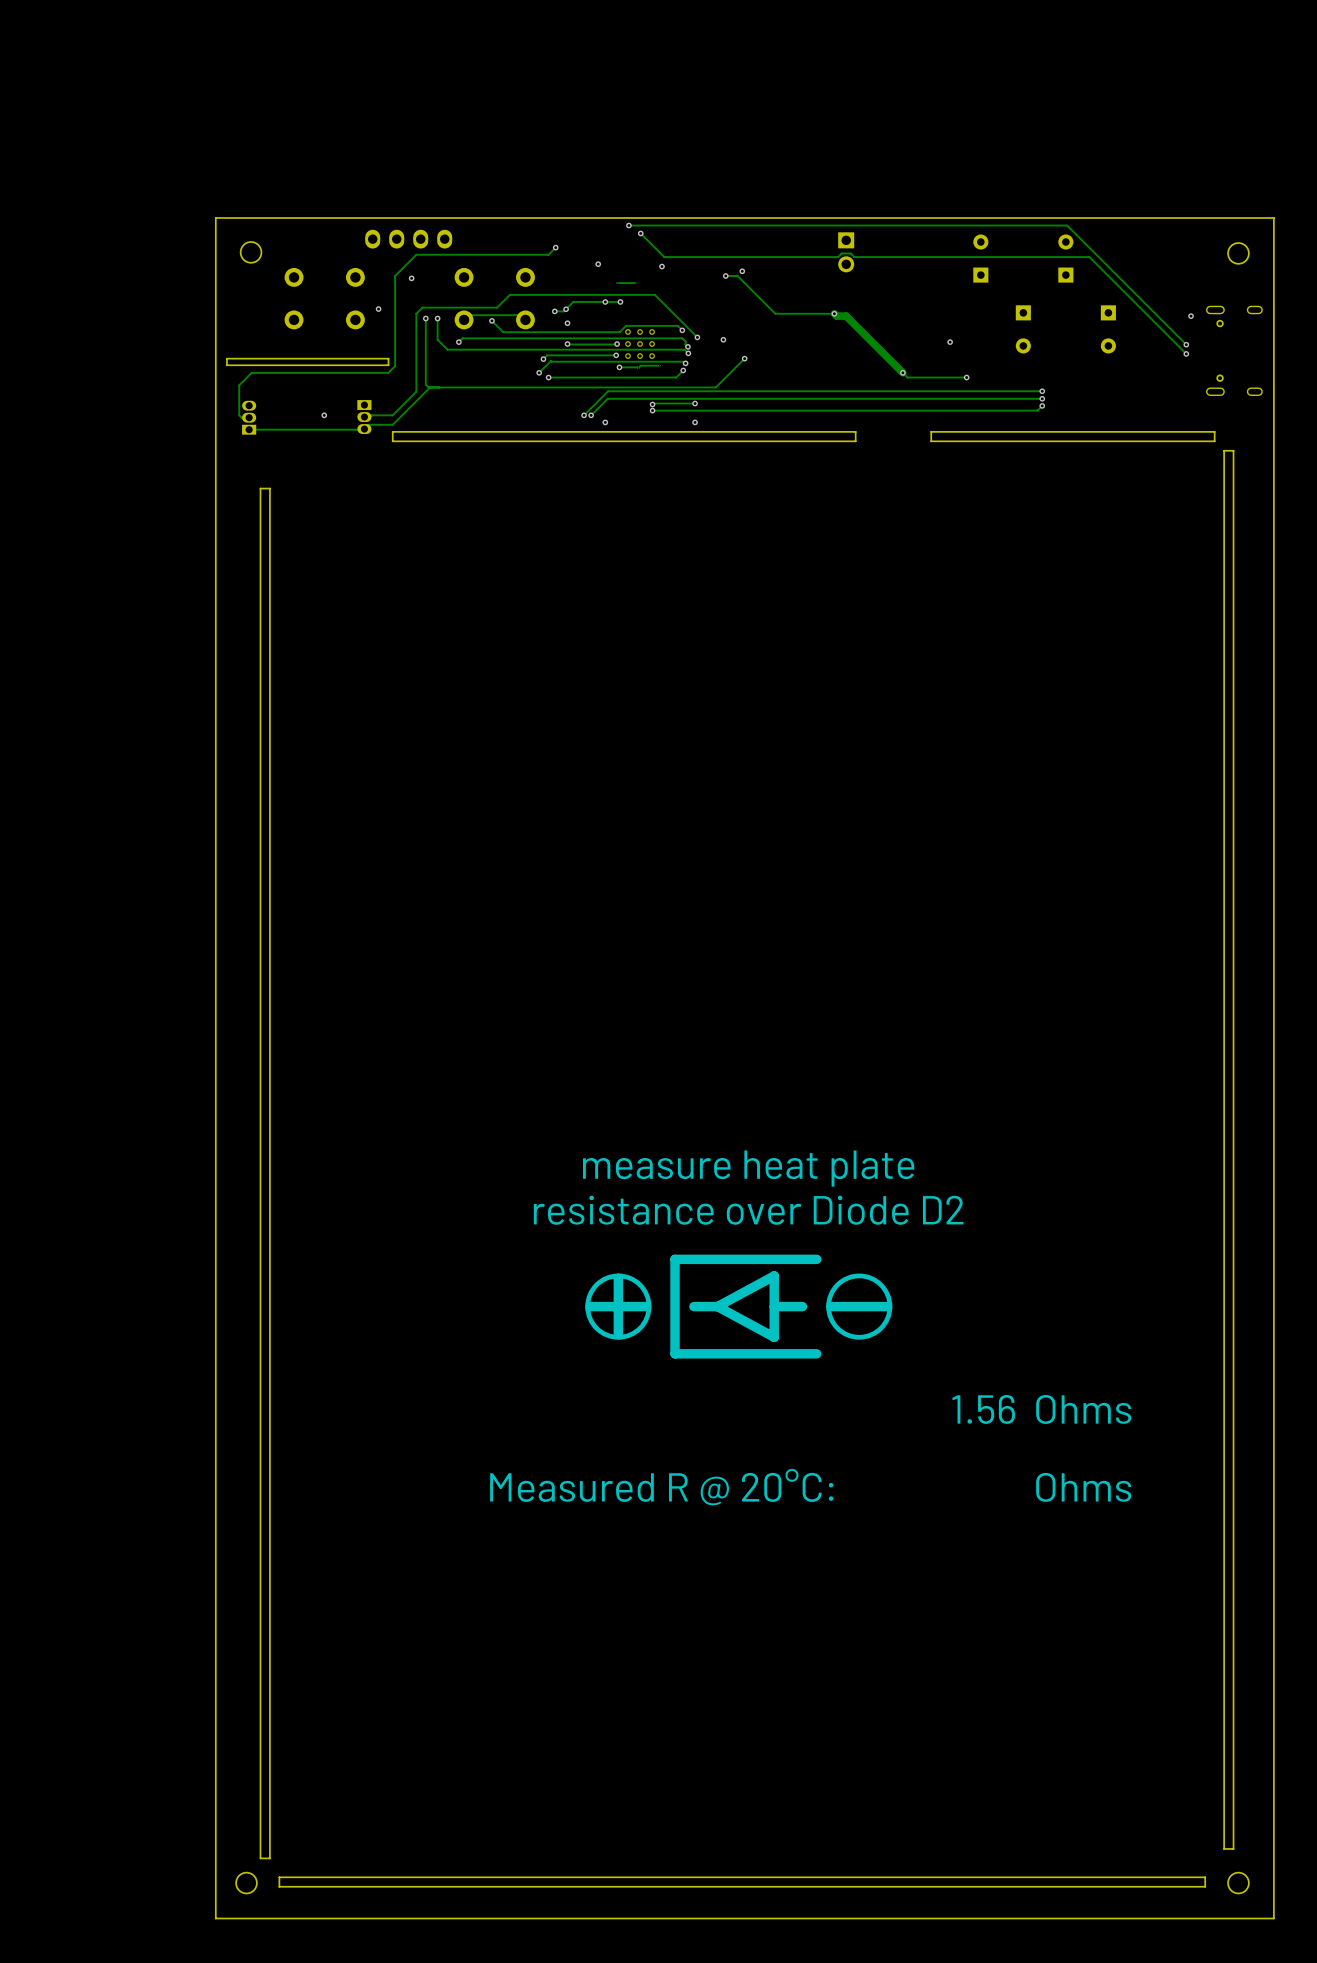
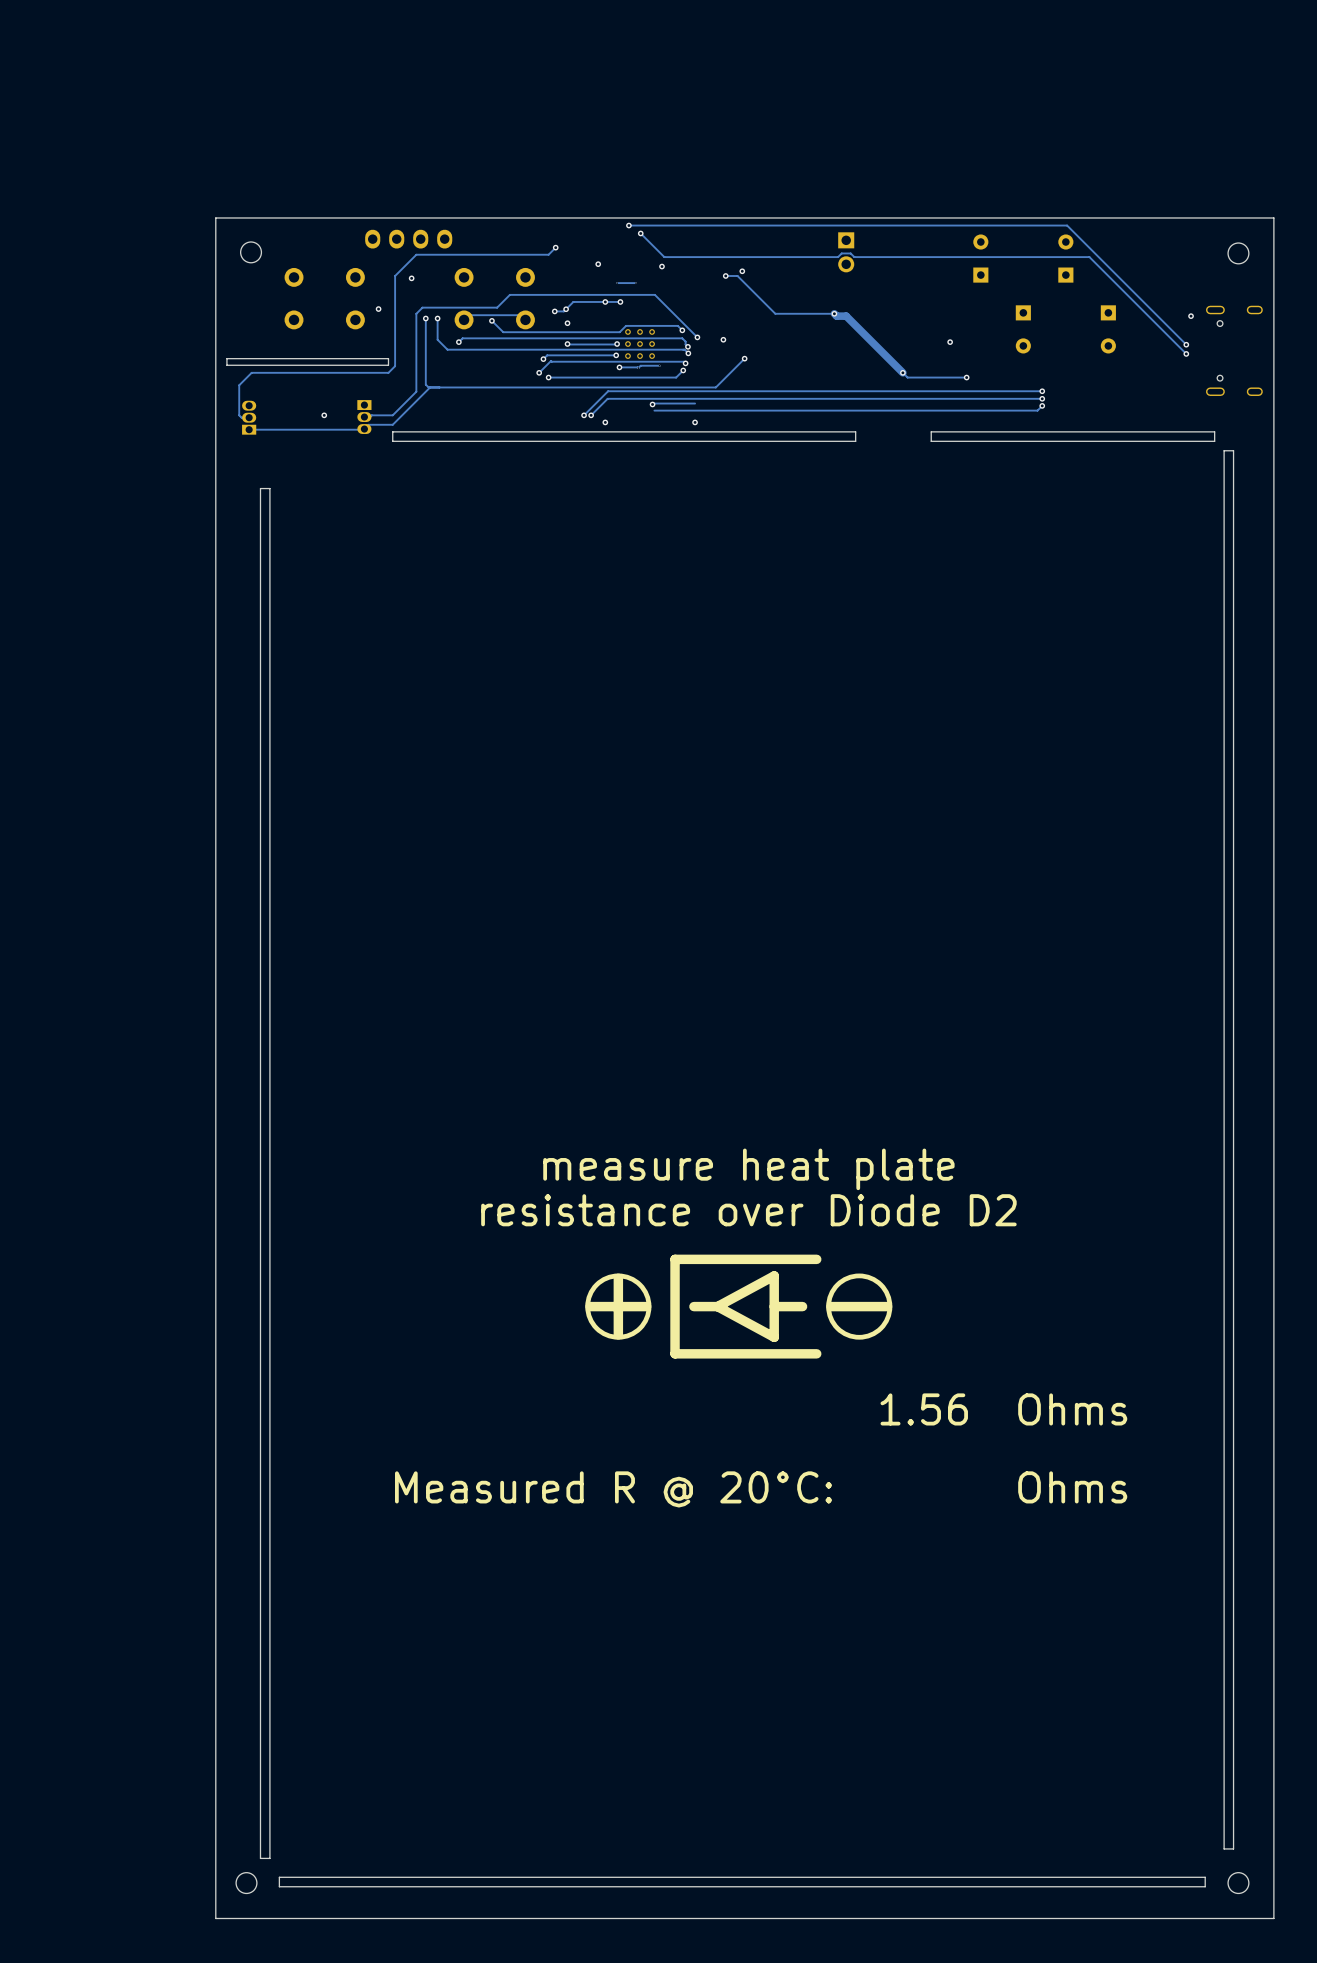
via: (695, 403) -> none
via: (652, 410) -> none

